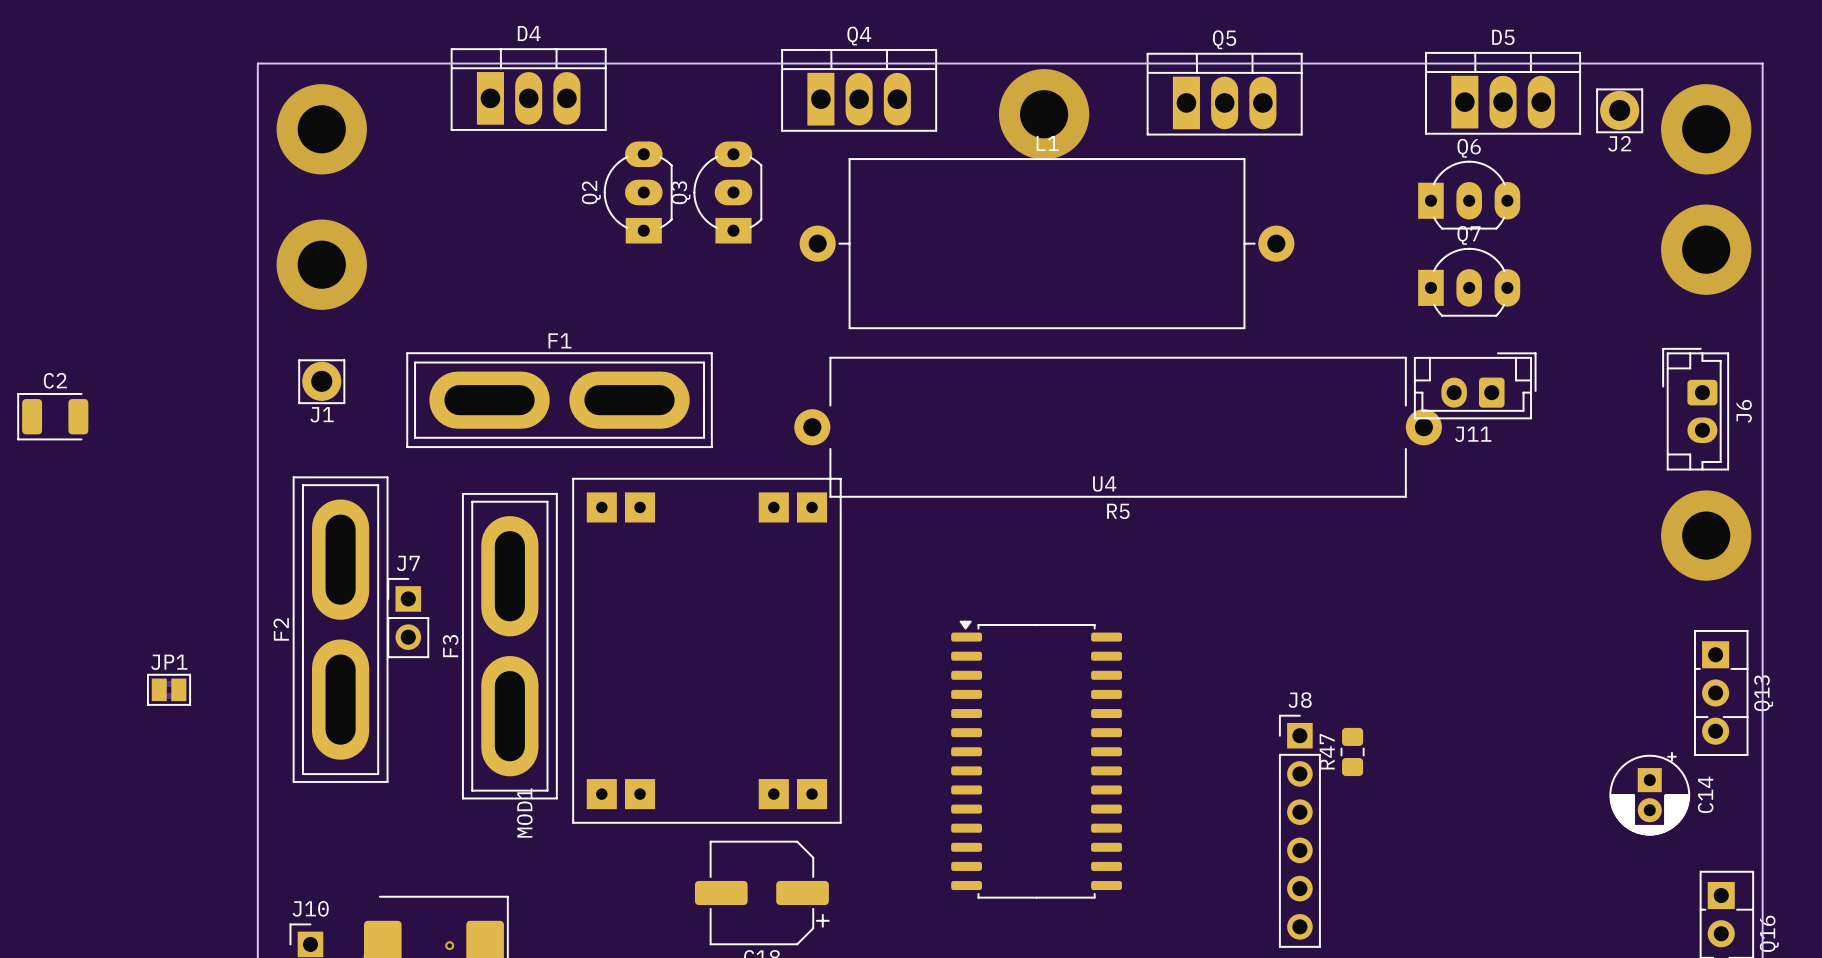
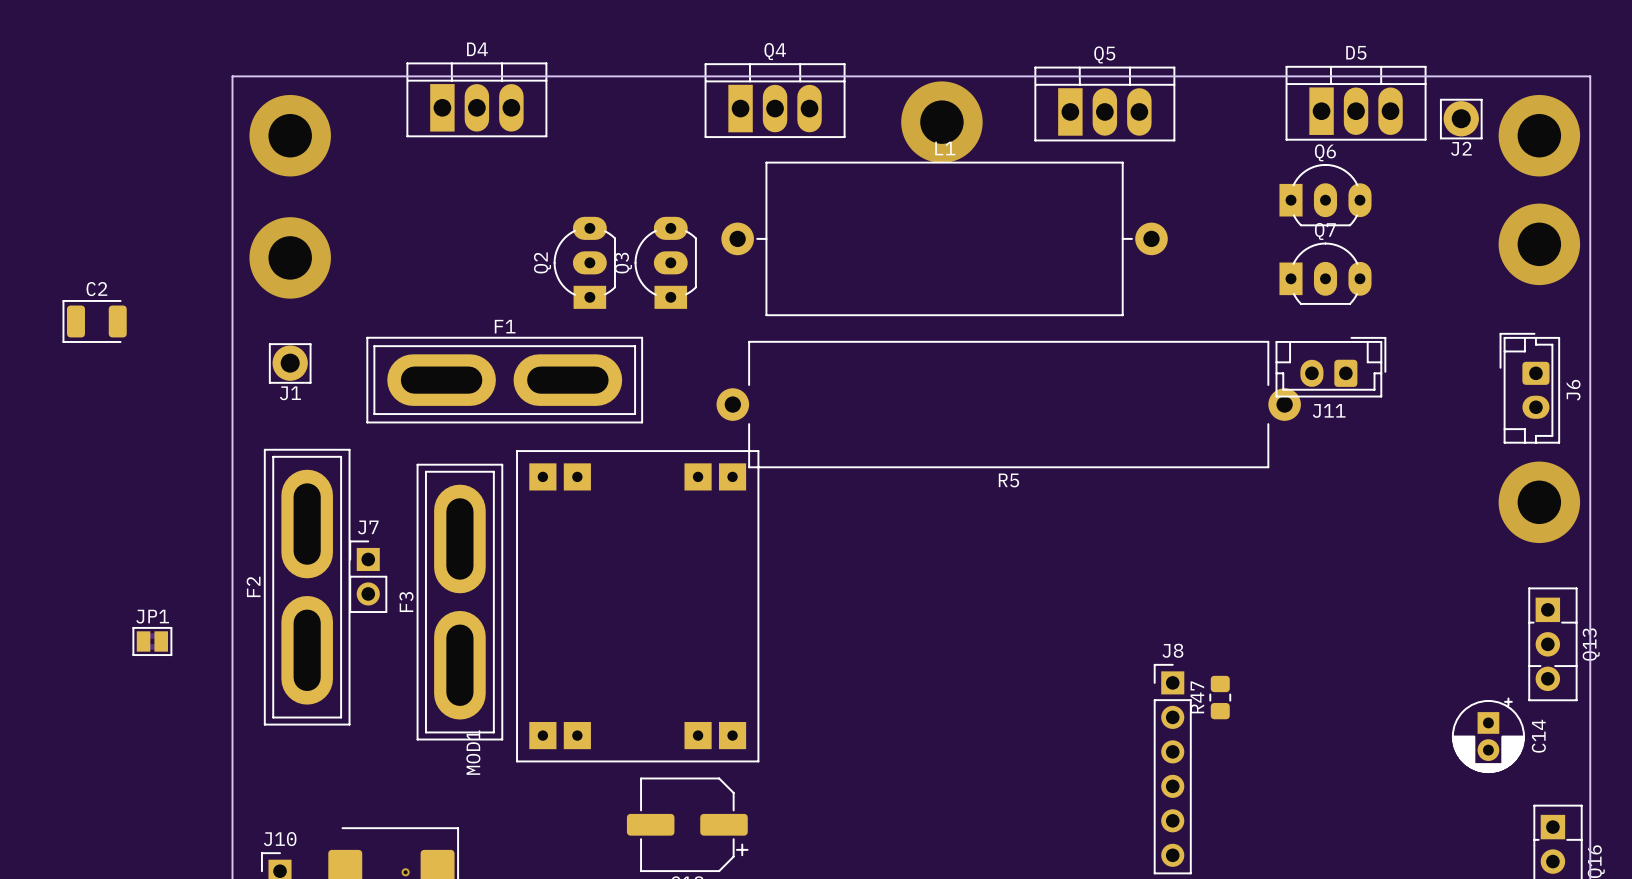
Q2 position: (638, 192) -> (584, 262)
Q3 position: (727, 192) -> (665, 262)
C2 position: (52, 416) -> (94, 321)
U4: (1036, 759) -> none

